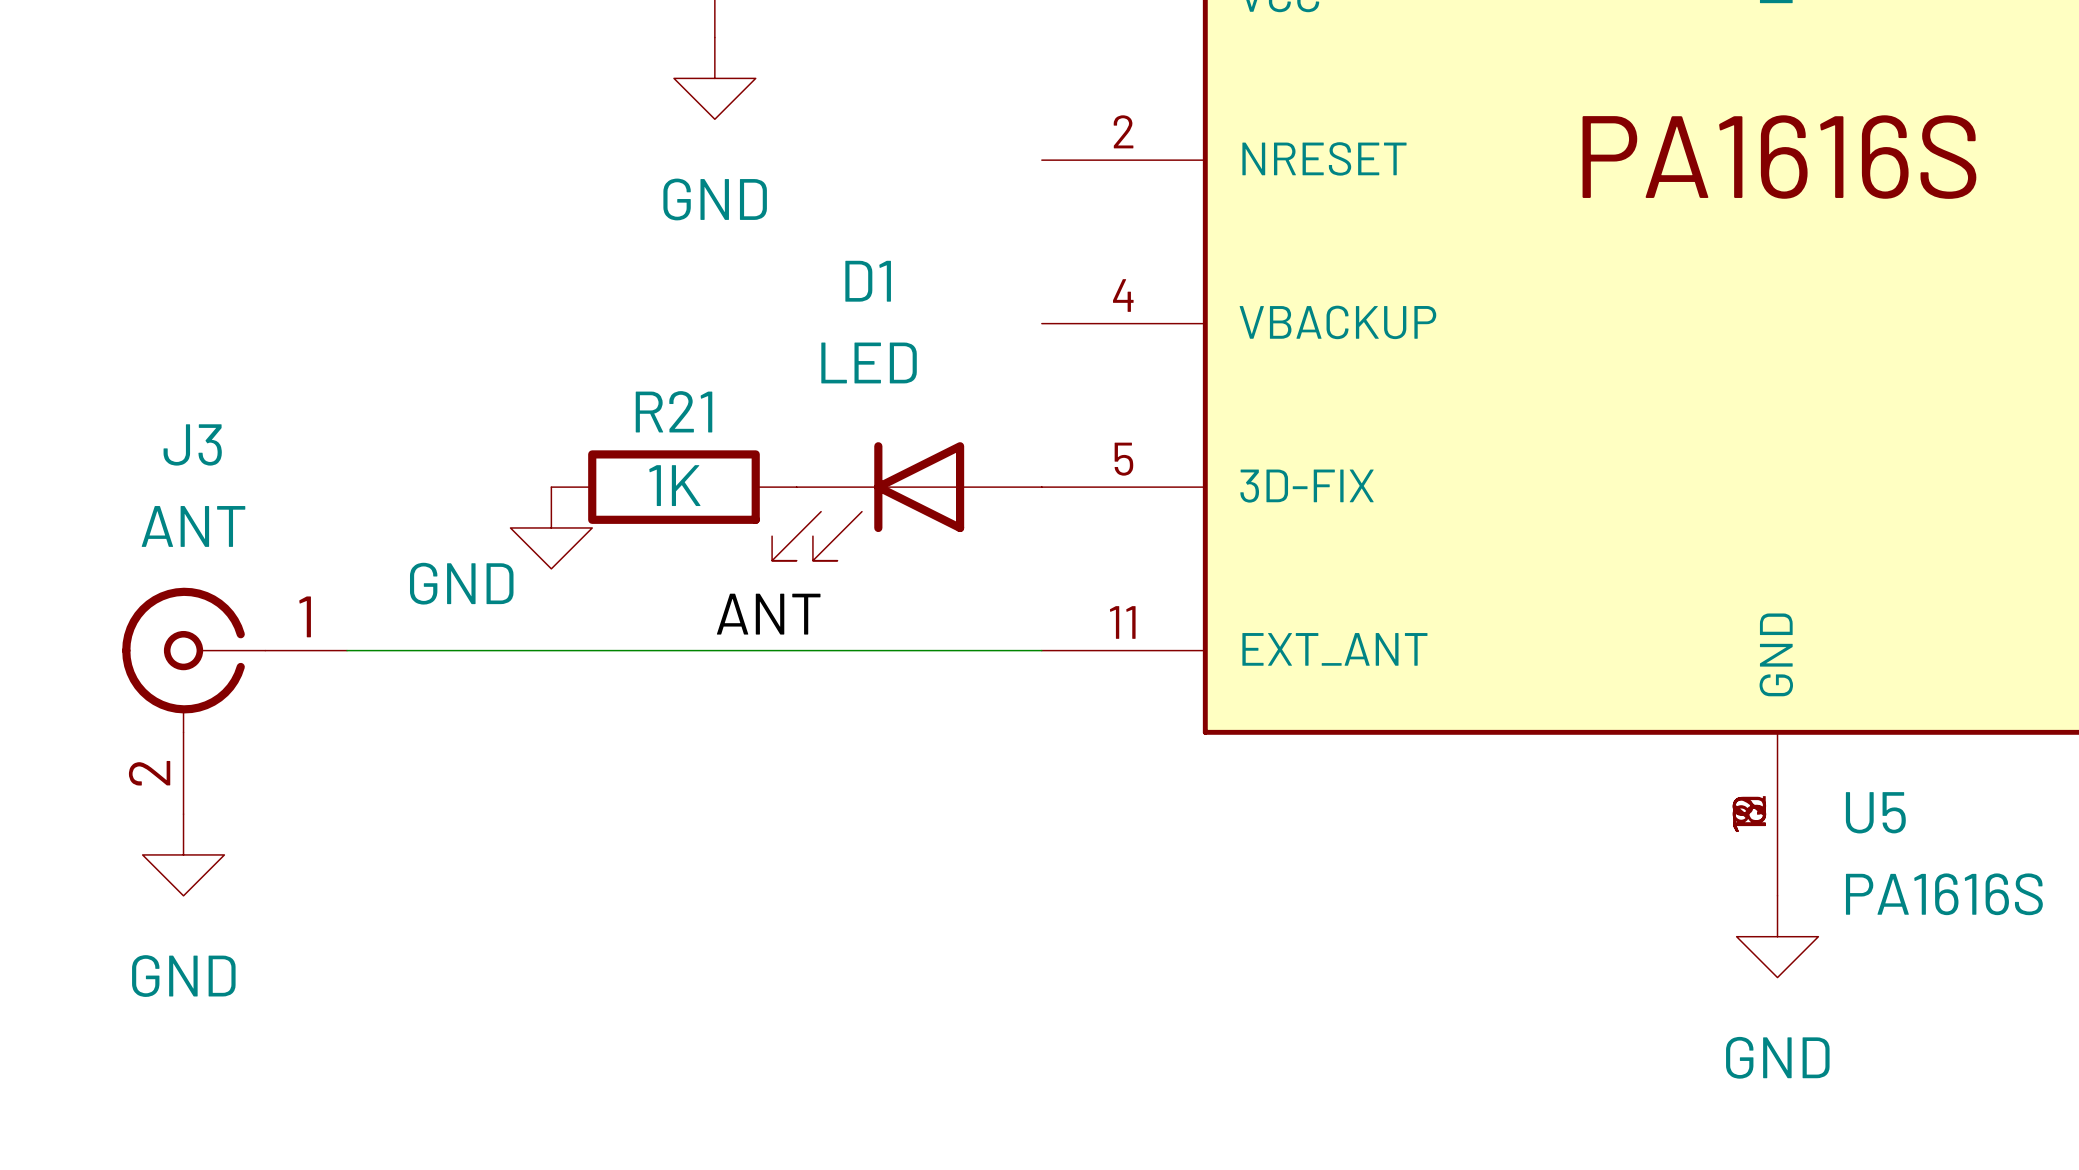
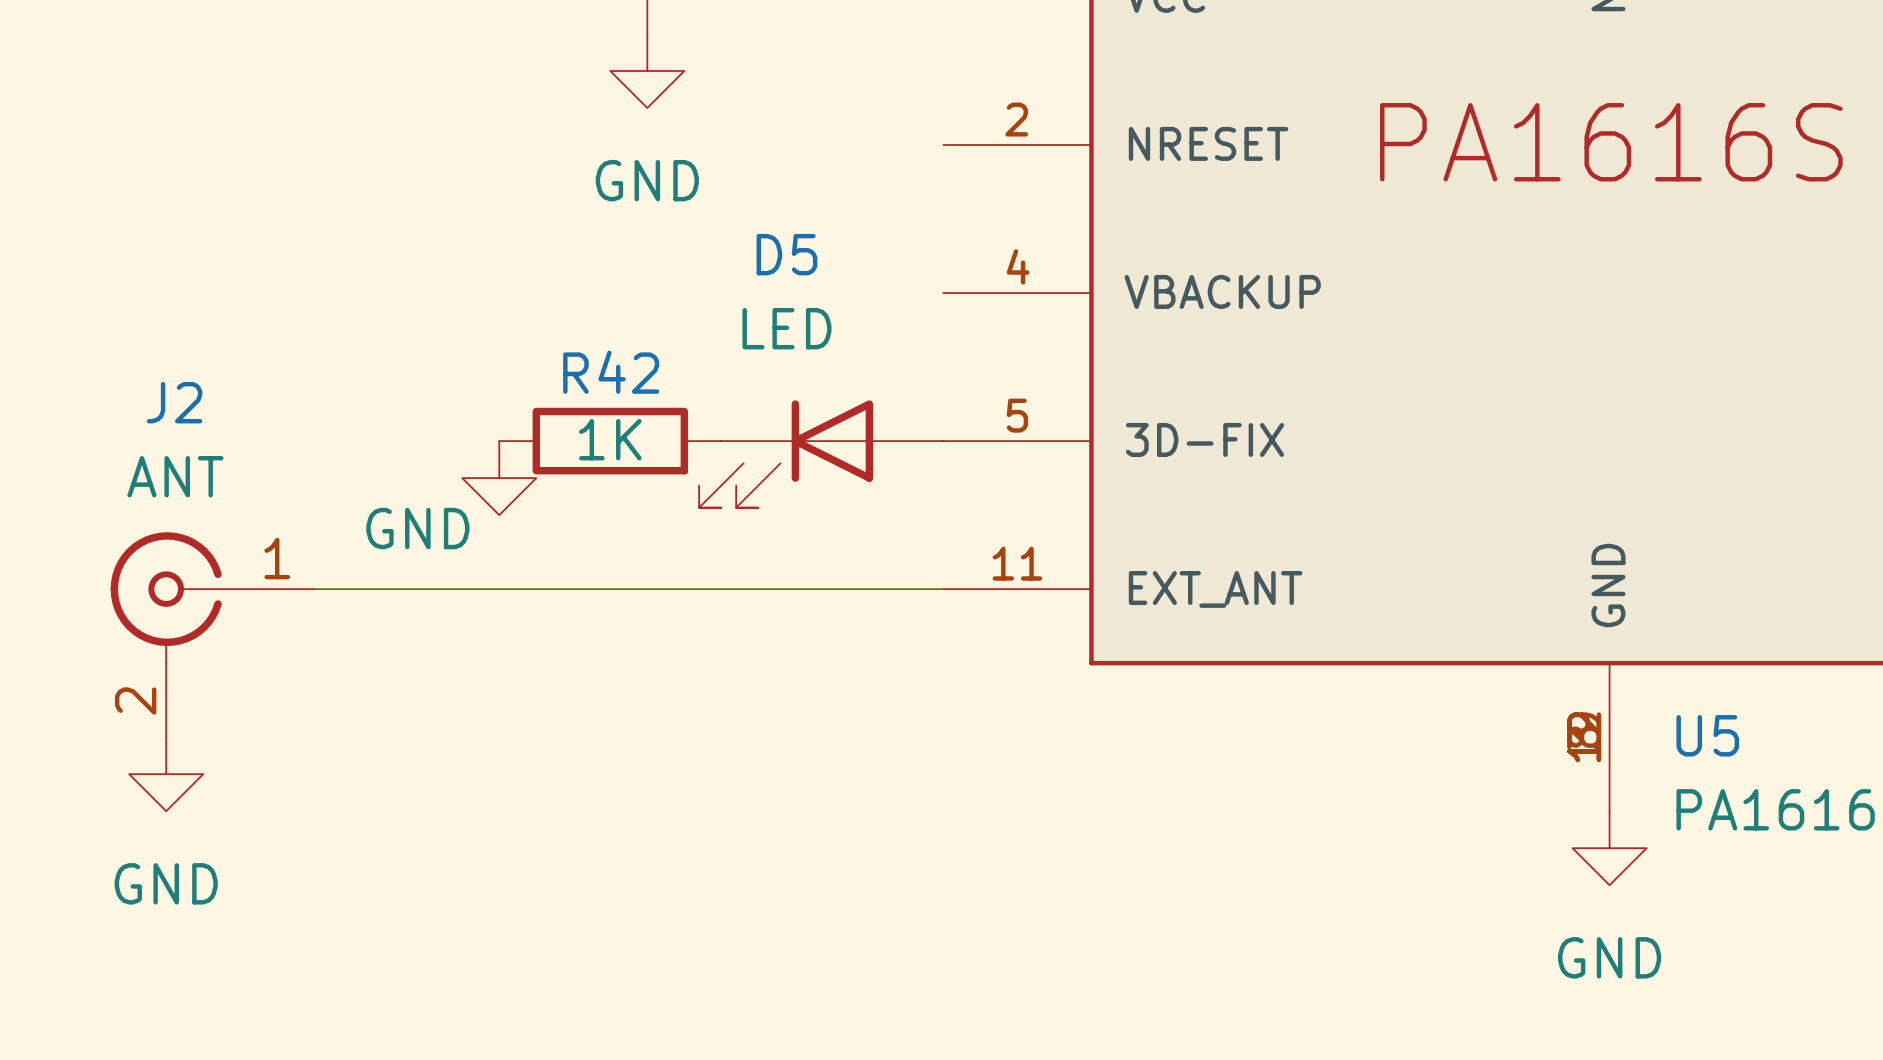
D1 name: D1 (868, 281) -> D5 (786, 254)
R21 name: R21 (674, 411) -> R42 (611, 372)
J3 name: J3 (192, 444) -> J2 (174, 402)
label: ANT (768, 614) -> none

